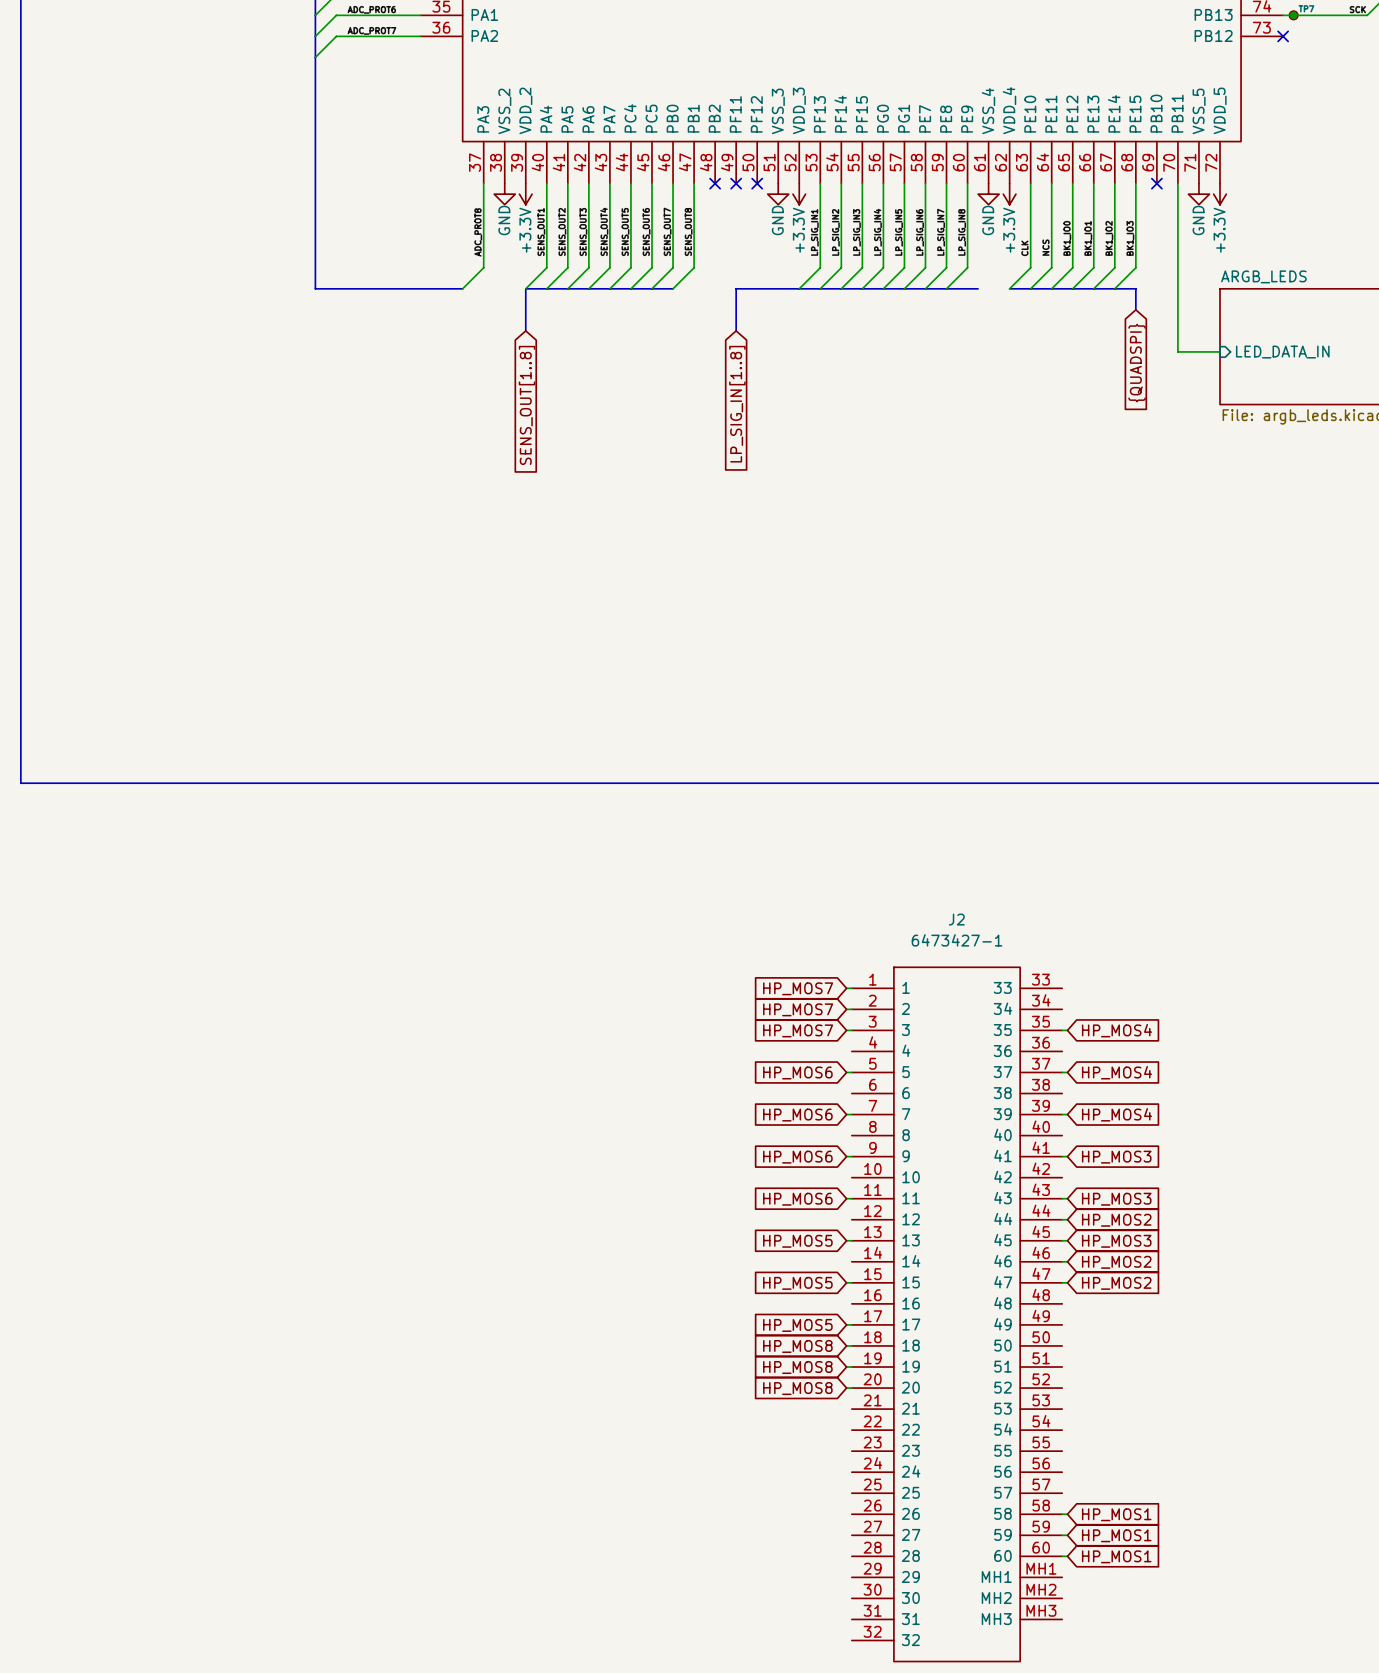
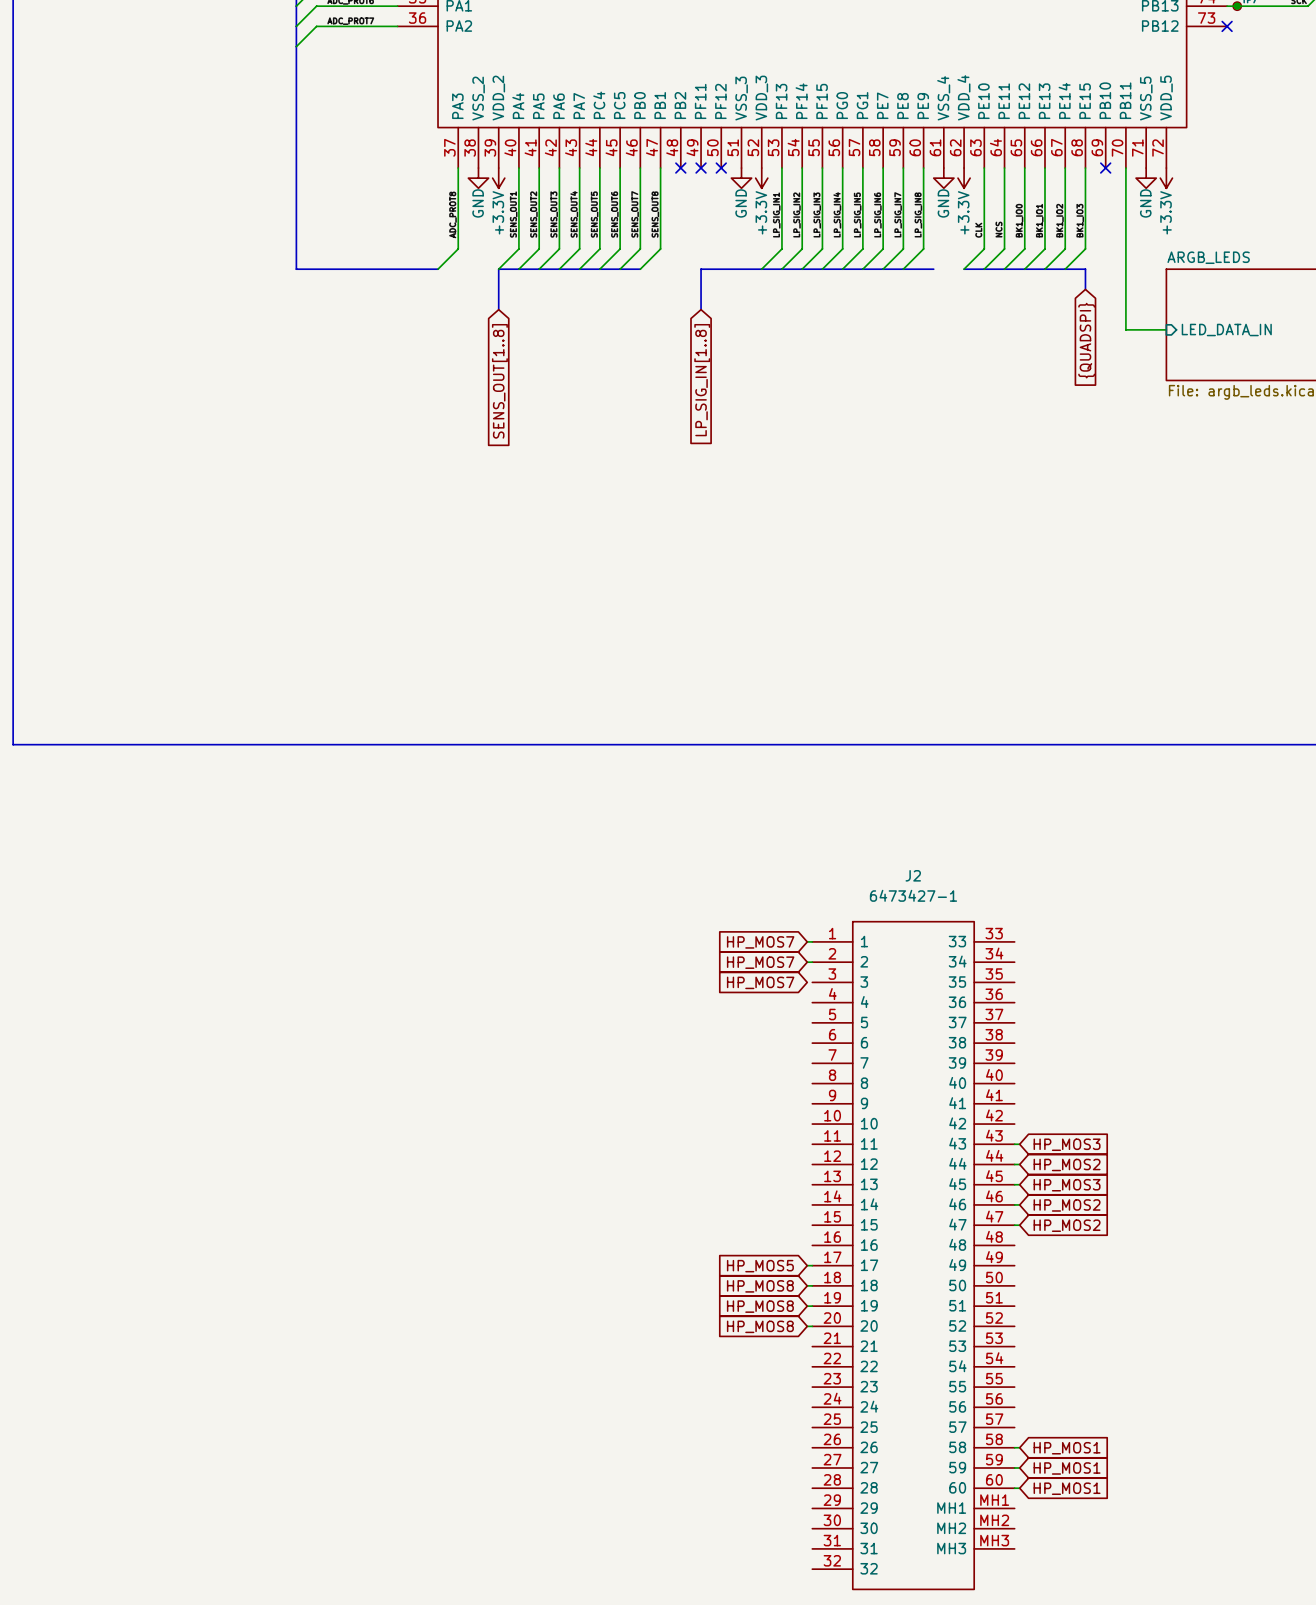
wire: (846, 1030) (851, 1030) -> none
wire: (1062, 1030) (1067, 1030) -> none
global label: HP_MOS4 (1116, 1030) -> none
global label: HP_MOS6 (797, 1072) -> none
wire: (846, 1072) (851, 1072) -> none
wire: (1062, 1072) (1067, 1072) -> none
global label: HP_MOS4 (1116, 1072) -> none
wire: (846, 1114) (851, 1114) -> none
wire: (1062, 1114) (1067, 1114) -> none
global label: HP_MOS4 (1116, 1114) -> none
global label: HP_MOS6 (797, 1115) -> none
wire: (846, 1156) (851, 1156) -> none
wire: (1062, 1156) (1067, 1156) -> none
global label: HP_MOS6 (797, 1157) -> none
global label: HP_MOS3 (1116, 1157) -> none
wire: (846, 1198) (851, 1198) -> none
global label: HP_MOS6 (797, 1199) -> none
wire: (846, 1240) (851, 1240) -> none
global label: HP_MOS5 (797, 1241) -> none
wire: (846, 1282) (851, 1282) -> none
global label: HP_MOS5 (797, 1283) -> none

